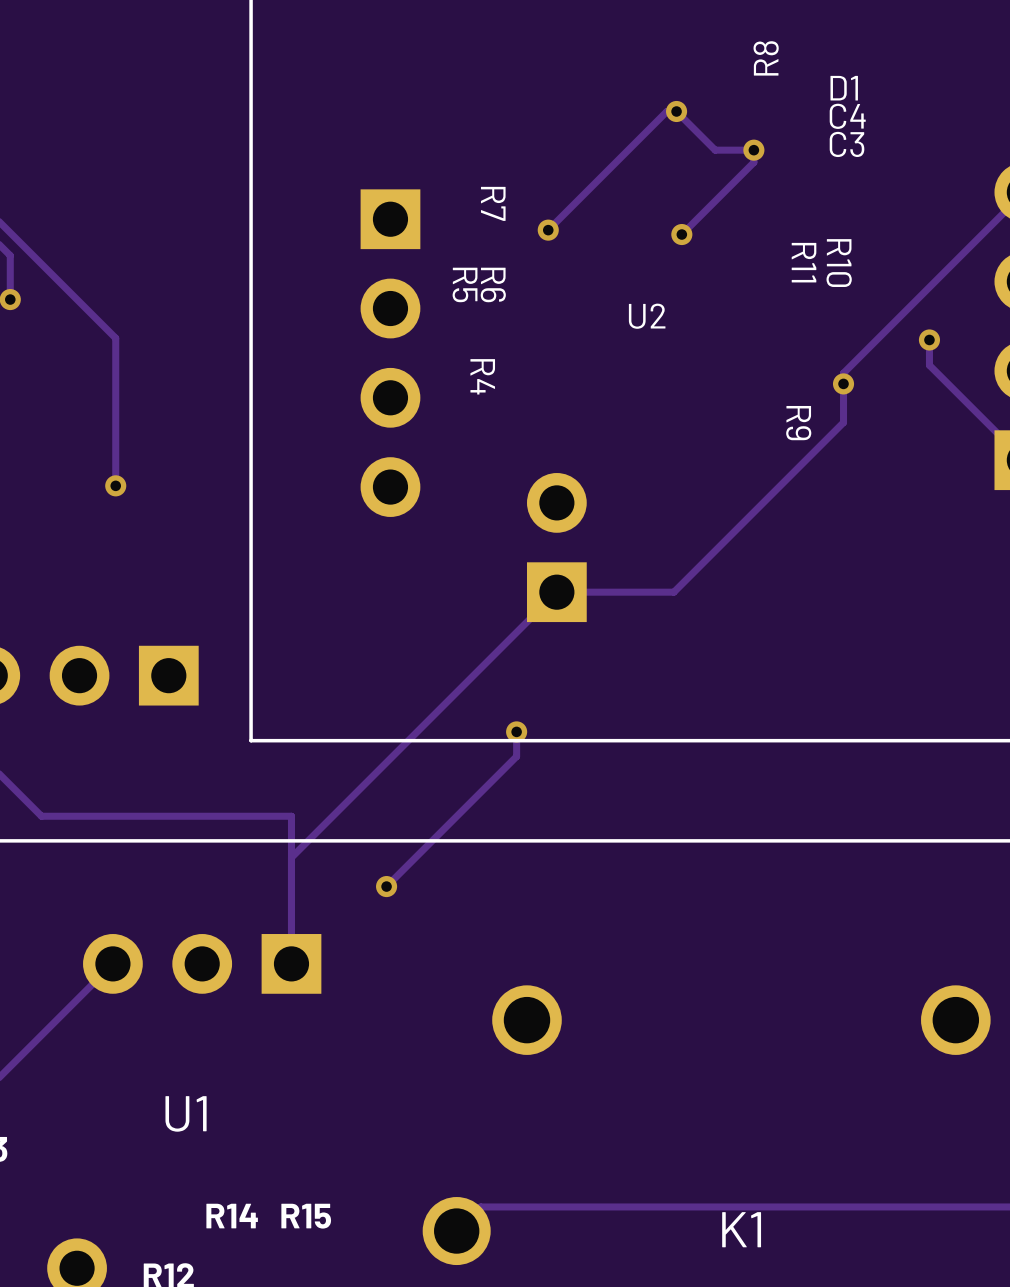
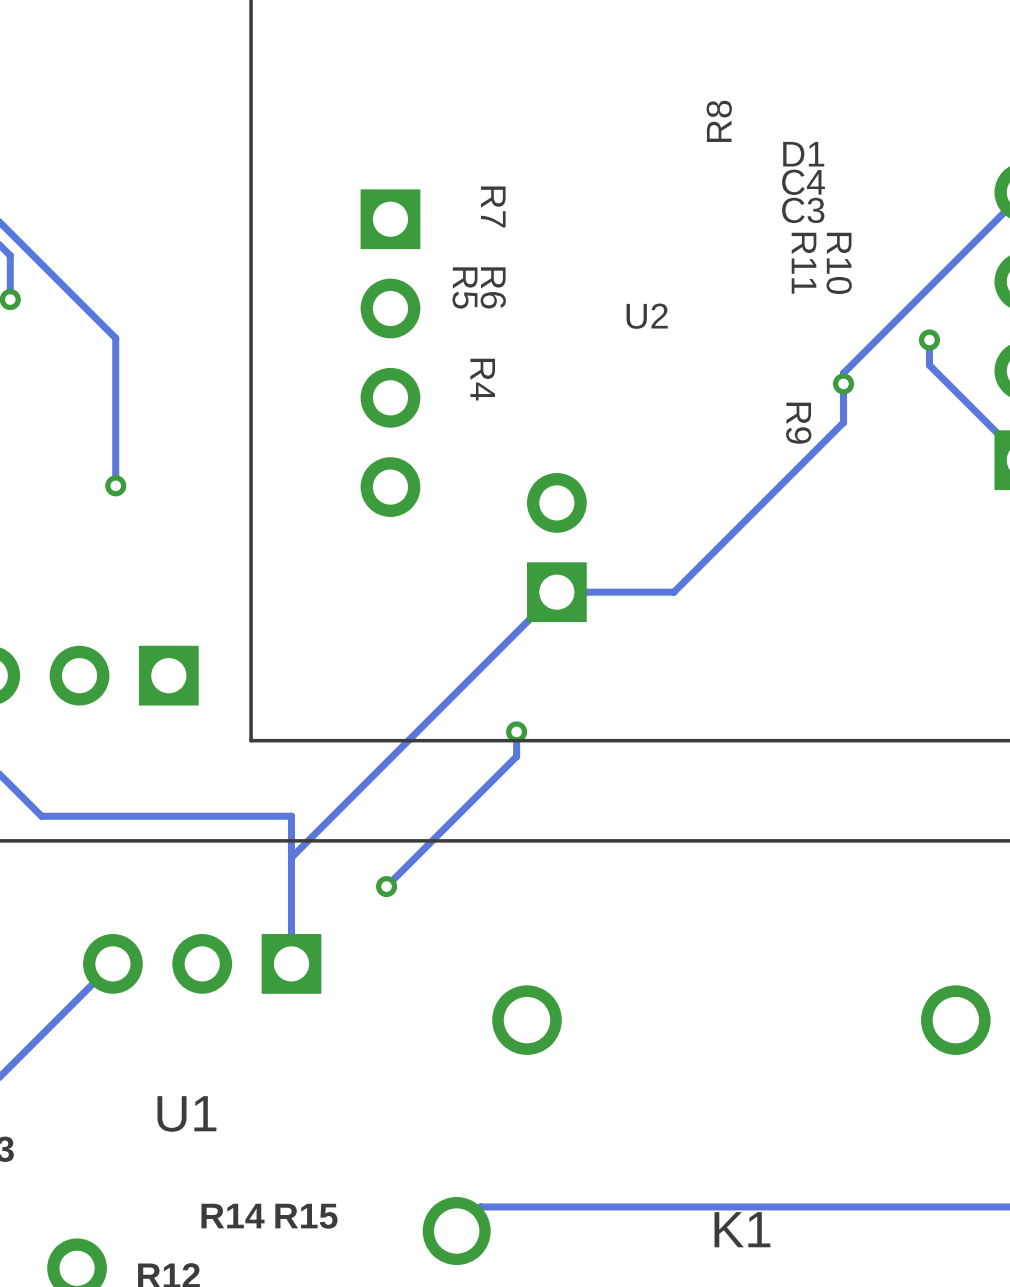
text position: R8 (766, 58) -> R8 (719, 121)
text position: D1 (844, 88) -> D1 (803, 154)
via: (676, 111) -> none
text position: C4 (847, 116) -> C4 (803, 182)
text position: C3 (847, 144) -> C3 (803, 210)
via: (753, 150) -> none
track: (548, 230) (666, 111) (676, 111) (715, 150) (753, 150) (753, 162) (681, 234) -> none
via: (548, 230) -> none
via: (681, 234) -> none

